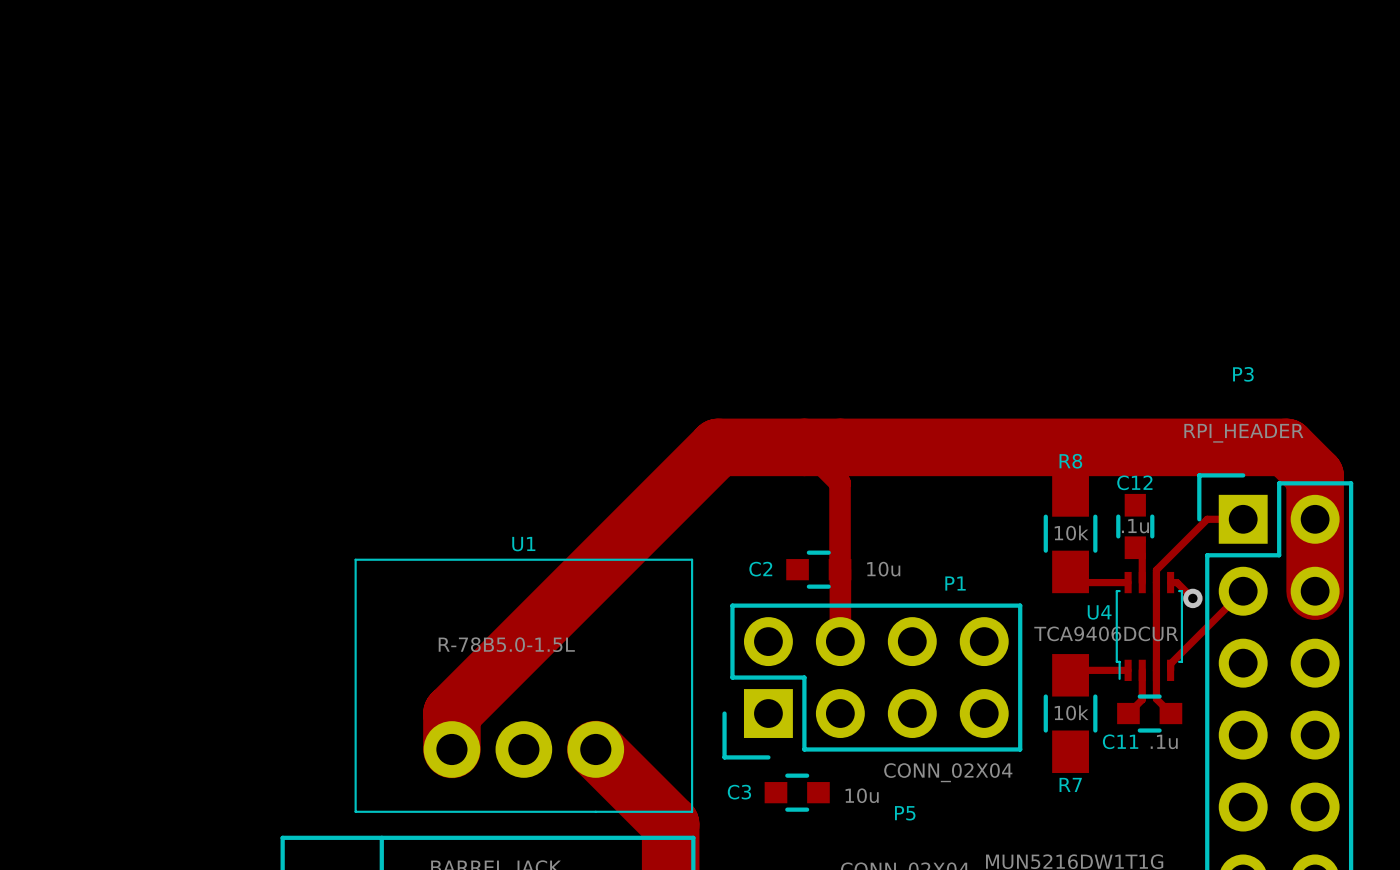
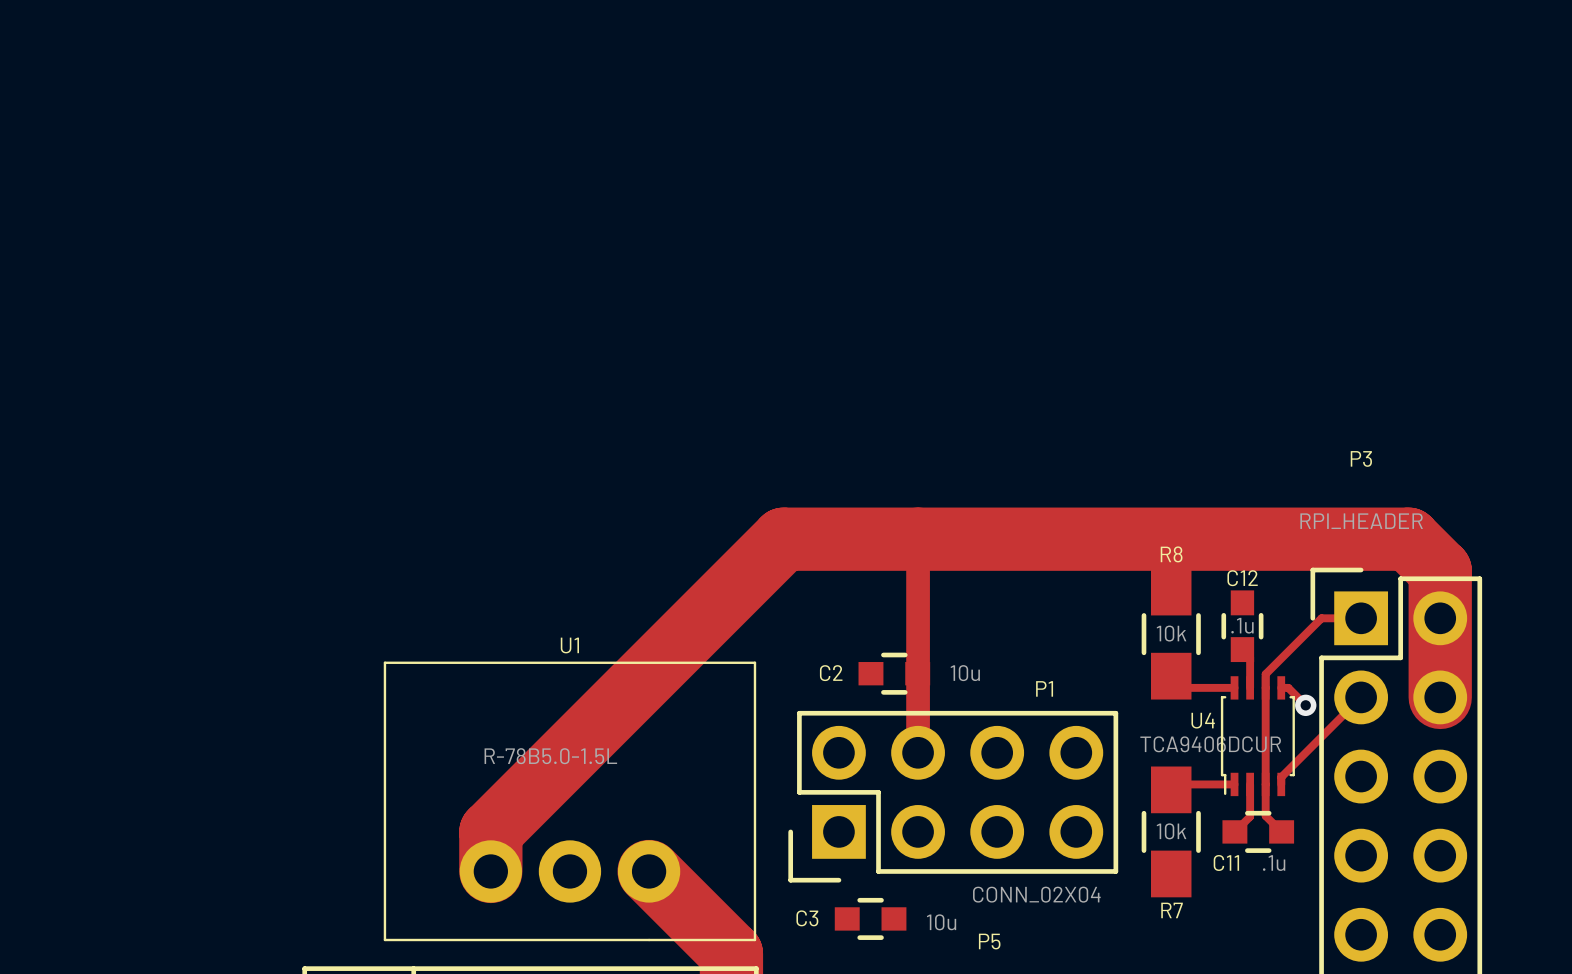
track: (804, 447) (840, 482) (840, 569) -> (918, 539) (918, 674)

